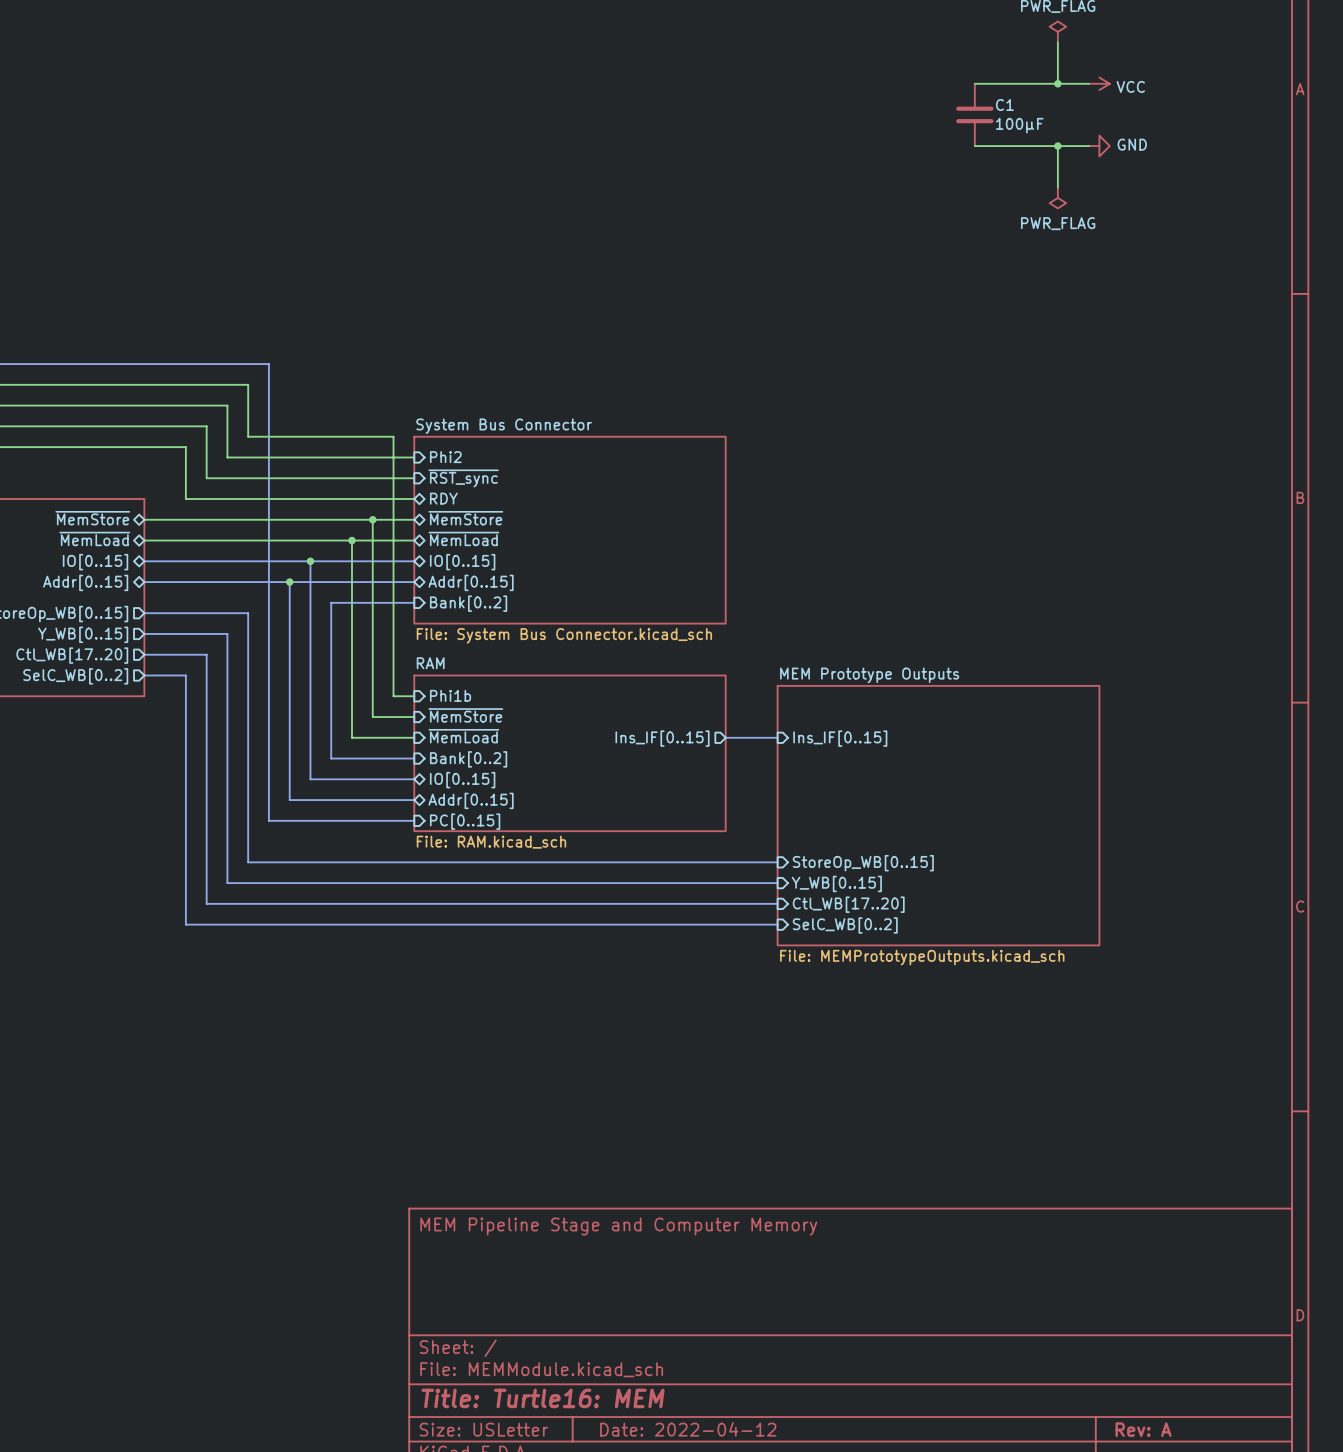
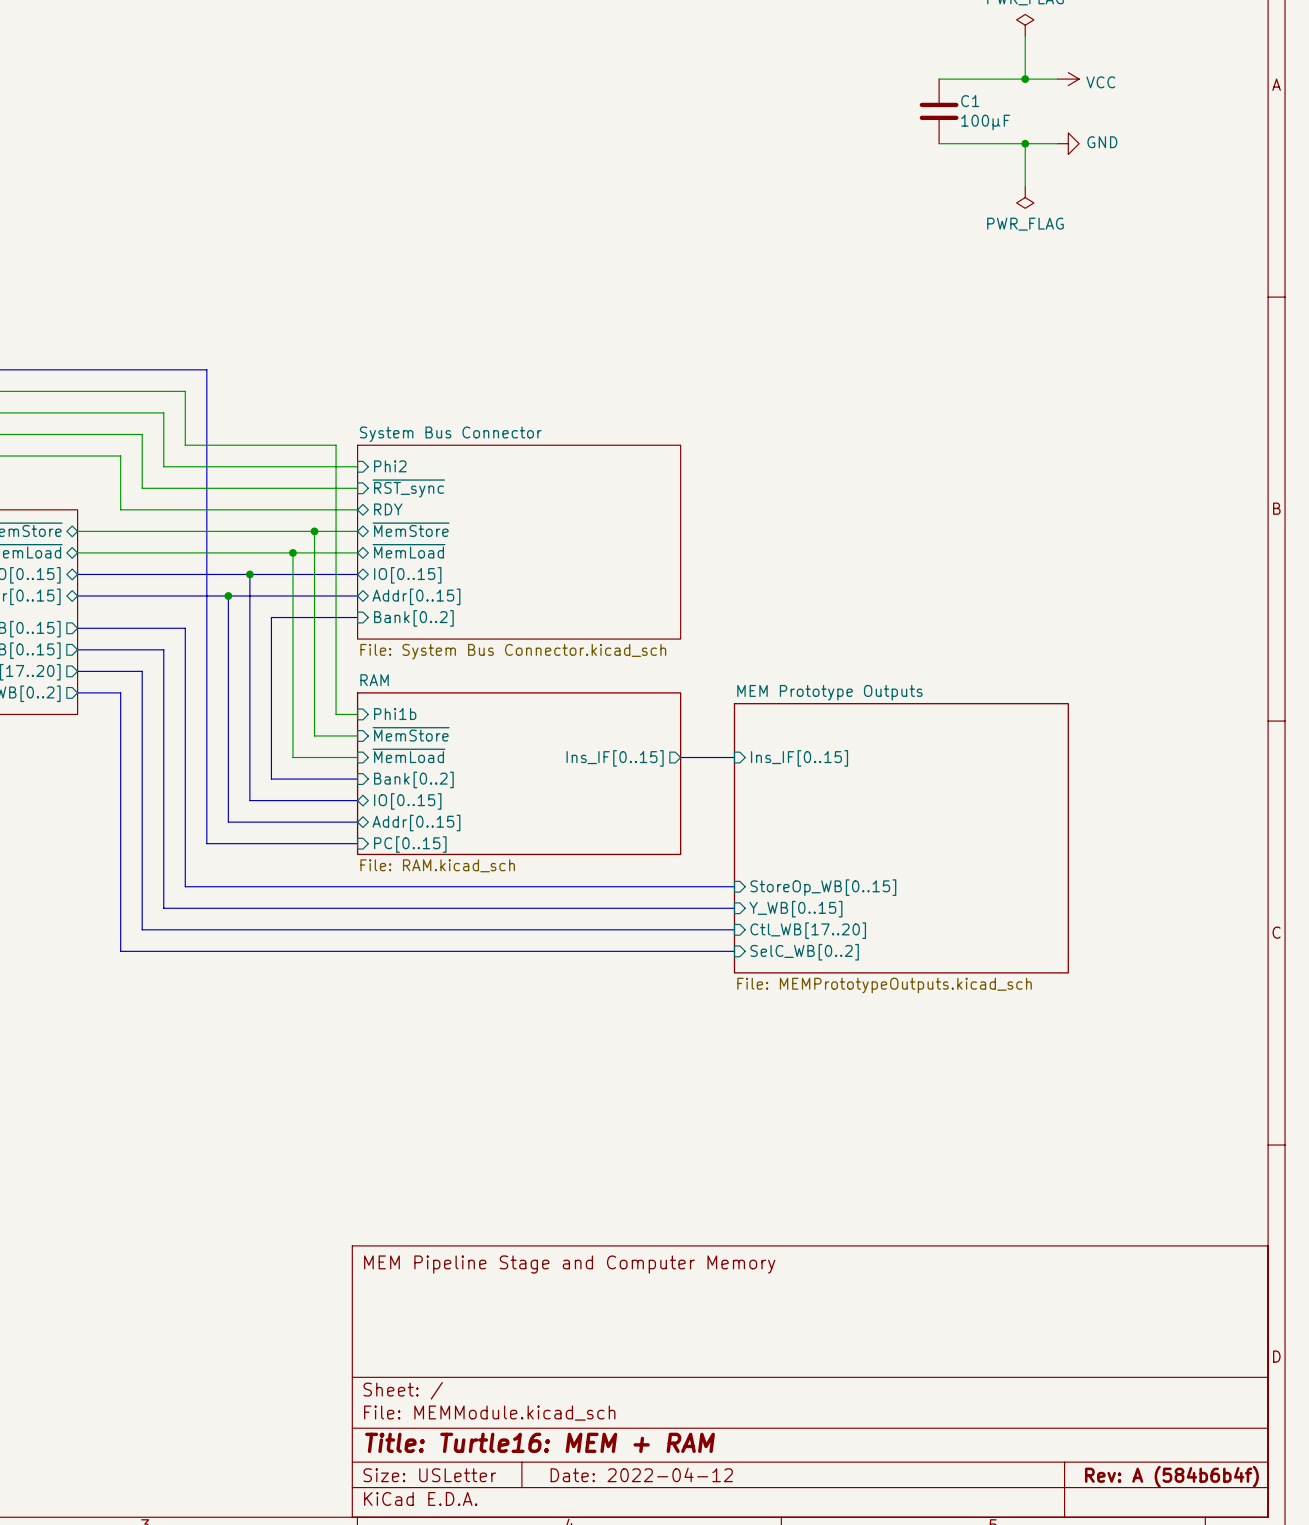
title block: Title: Turtle16: MEM (543, 1398) -> Title: Turtle16: MEM + RAM (539, 1442)
title block: Rev: A (1143, 1429) -> Rev: A (584b6b4f) (1171, 1476)

